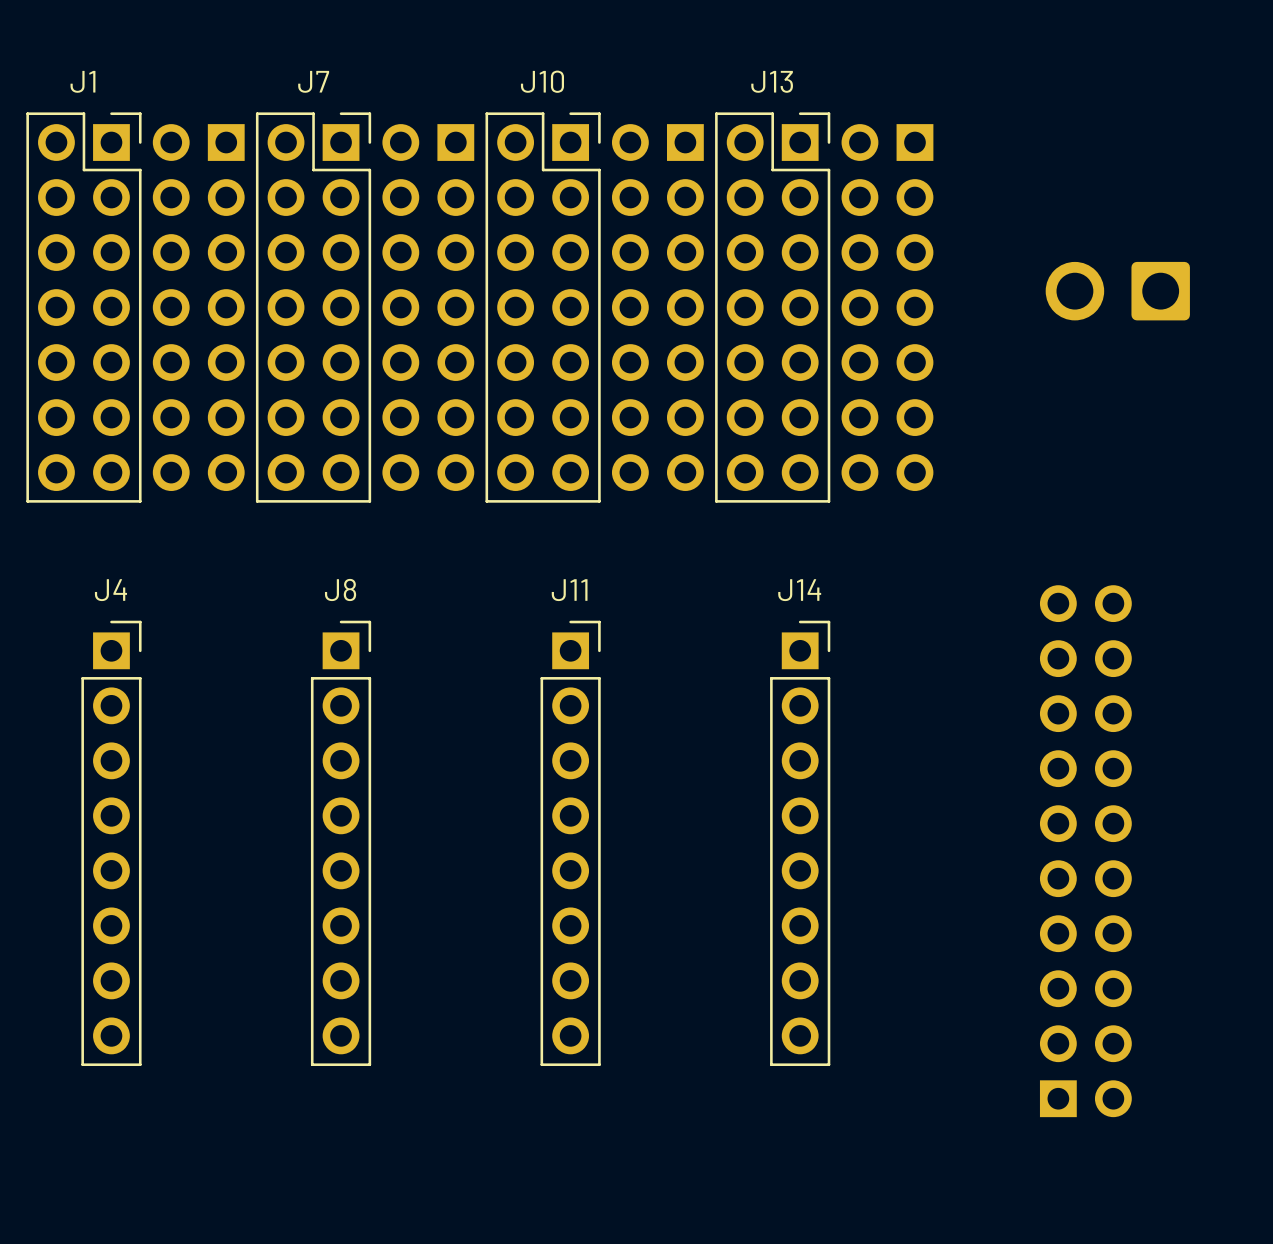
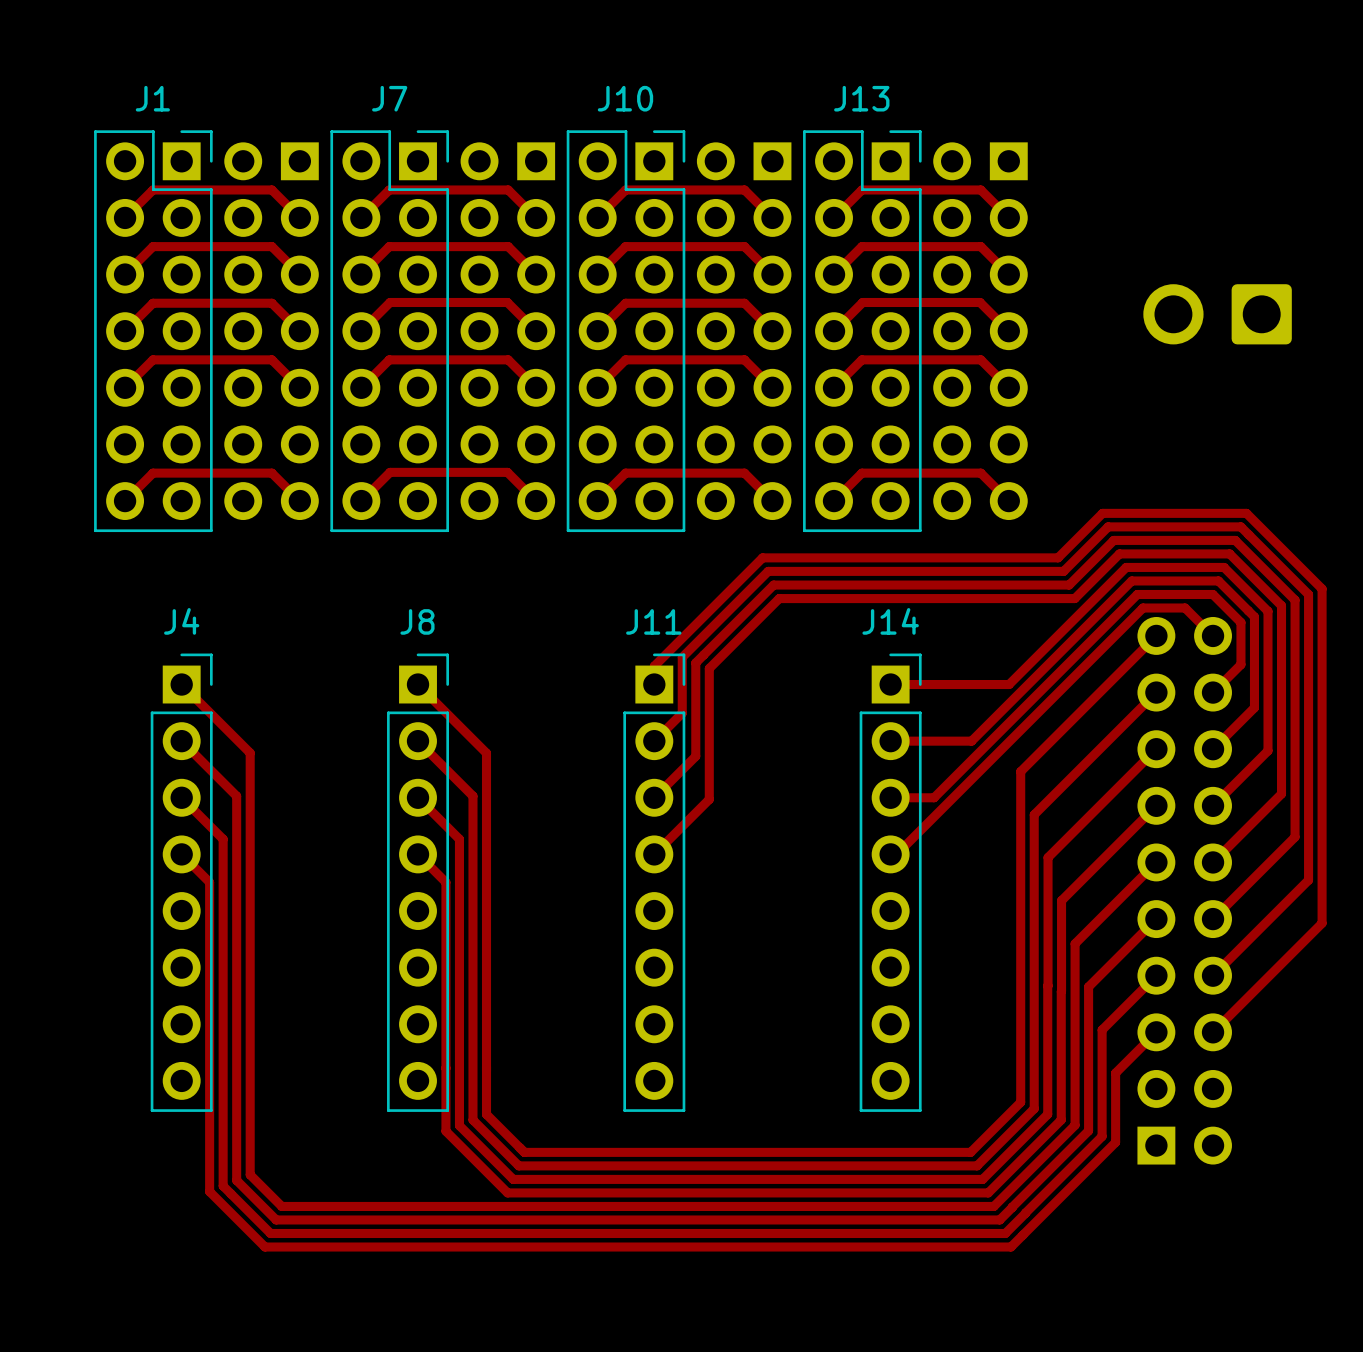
top track: none -> (125, 217) (153, 189) (271, 189) (299, 217)
top track: none -> (361, 217) (389, 189) (508, 189) (536, 217)
top track: none -> (597, 217) (625, 189) (744, 189) (772, 217)
top track: none -> (834, 217) (861, 189) (980, 189) (1008, 217)
top track: none -> (125, 274) (153, 246) (271, 246) (299, 274)
top track: none -> (361, 274) (389, 246) (508, 246) (536, 274)
top track: none -> (597, 274) (625, 246) (744, 246) (772, 274)
top track: none -> (834, 274) (861, 246) (980, 246) (1008, 274)
top track: none -> (125, 331) (153, 303) (271, 303) (299, 331)
top track: none -> (361, 331) (390, 302) (507, 302) (536, 331)
top track: none -> (597, 331) (625, 303) (744, 303) (772, 331)
top track: none -> (834, 331) (862, 302) (980, 302) (1008, 331)
top track: none -> (125, 387) (153, 359) (271, 359) (299, 387)
top track: none -> (361, 387) (389, 359) (508, 359) (536, 387)
top track: none -> (597, 387) (625, 359) (744, 359) (772, 387)
top track: none -> (834, 387) (861, 359) (980, 359) (1008, 387)
top track: none -> (125, 501) (153, 473) (271, 473) (299, 501)
top track: none -> (361, 501) (390, 472) (507, 472) (536, 501)
top track: none -> (597, 501) (625, 473) (744, 473) (772, 501)
top track: none -> (834, 501) (861, 473) (980, 473) (1008, 501)
top track: none -> (1156, 635) (1020, 771) (1020, 1102) (970, 1152) (524, 1152) (486, 1114) (486, 753) (418, 684)
top track: none -> (1213, 635) (1185, 608) (1142, 608) (896, 854) (890, 854)
top track: none -> (181, 684) (250, 753) (250, 1174) (281, 1206) (993, 1206) (1075, 1125) (1075, 943) (1156, 862)
top track: none -> (654, 684) (654, 666) (762, 557) (1058, 557) (1102, 513) (1246, 513) (1322, 588) (1322, 923) (1213, 1032)
top track: none -> (890, 684) (1009, 684) (1126, 567) (1224, 567) (1268, 611) (1268, 750) (1213, 805)
top track: none -> (1156, 692) (1034, 814) (1034, 1108) (977, 1165) (518, 1165) (472, 1120) (472, 796) (418, 741)
top track: none -> (1213, 692) (1240, 664) (1240, 622) (1212, 594) (1137, 594) (934, 797) (890, 797)
top track: none -> (181, 741) (236, 796) (236, 1180) (276, 1219) (999, 1219) (1012, 1207)
top track: none -> (654, 741) (682, 713) (682, 657) (768, 571) (1063, 571) (1108, 526) (1240, 526) (1308, 594) (1308, 880) (1213, 975)
top track: none -> (890, 741) (971, 741) (1131, 580) (1218, 580) (1254, 616) (1254, 707) (1213, 749)
top track: none -> (1156, 749) (1048, 857) (1048, 985)
top track: none -> (181, 797) (223, 839) (223, 1186) (270, 1233) (1005, 1233) (1025, 1213)
top track: none -> (418, 797) (459, 839) (459, 1125) (513, 1179) (982, 1179) (1047, 1114) (1047, 985)
top track: none -> (654, 797) (695, 756) (695, 662) (773, 585) (1069, 585) (1113, 540) (1235, 540) (1295, 600) (1295, 837) (1213, 919)
top track: none -> (1156, 805) (1061, 900) (1061, 991)
top track: none -> (181, 854) (209, 882) (209, 1191) (265, 1247) (1010, 1247) (1115, 1142) (1115, 1073) (1156, 1032)
top track: none -> (418, 854) (445, 882) (445, 1131) (507, 1192) (988, 1192) (1061, 1119) (1061, 991)
top track: none -> (654, 854) (709, 799) (709, 668) (779, 598) (1074, 598) (1119, 553) (1229, 553) (1281, 605) (1281, 793) (1213, 862)
top track: none -> (1156, 919) (1088, 986) (1088, 1130) (1012, 1207)
top track: none -> (1156, 975) (1102, 1029) (1102, 1136) (1025, 1212)

